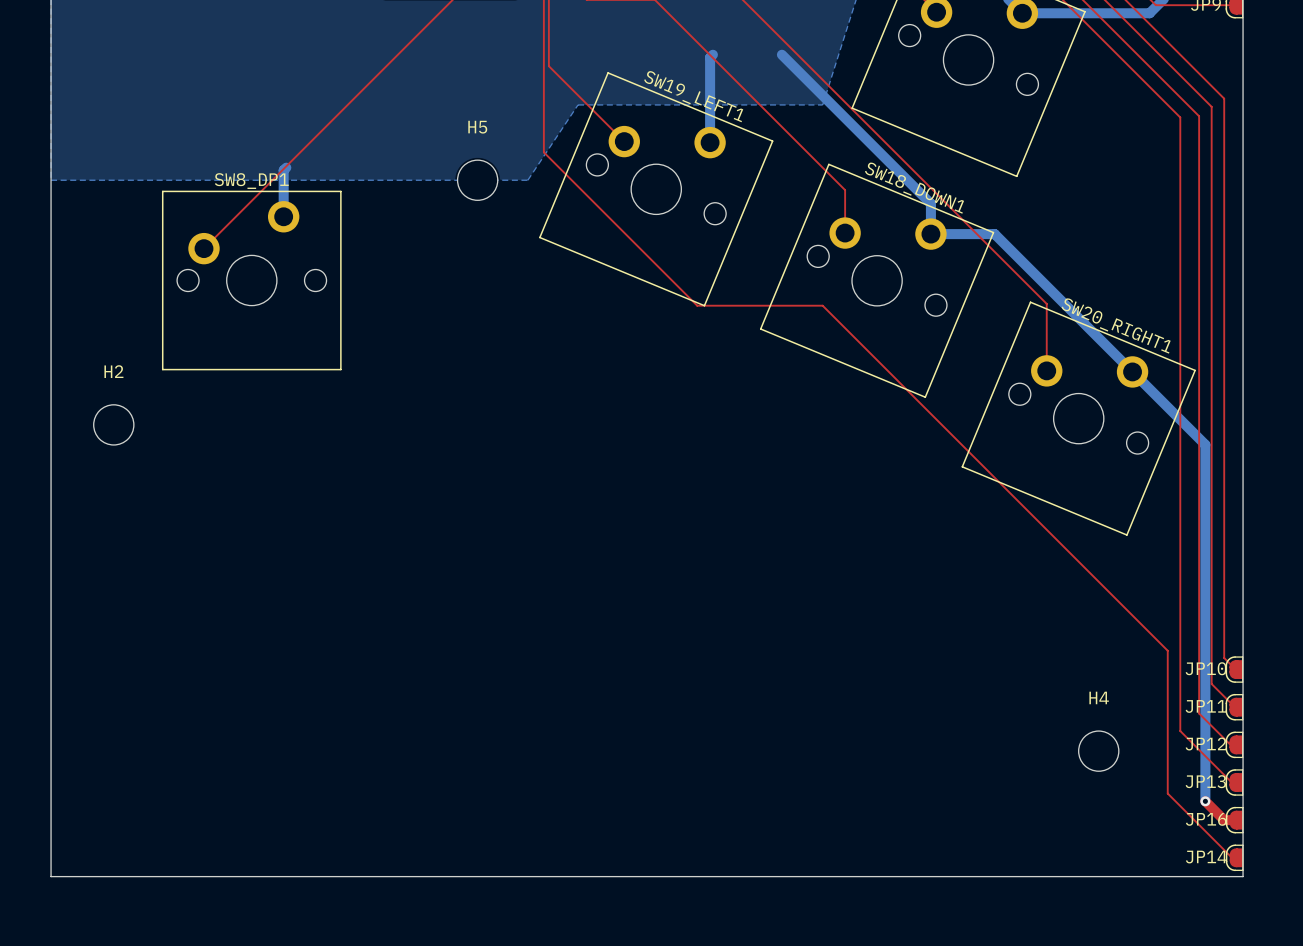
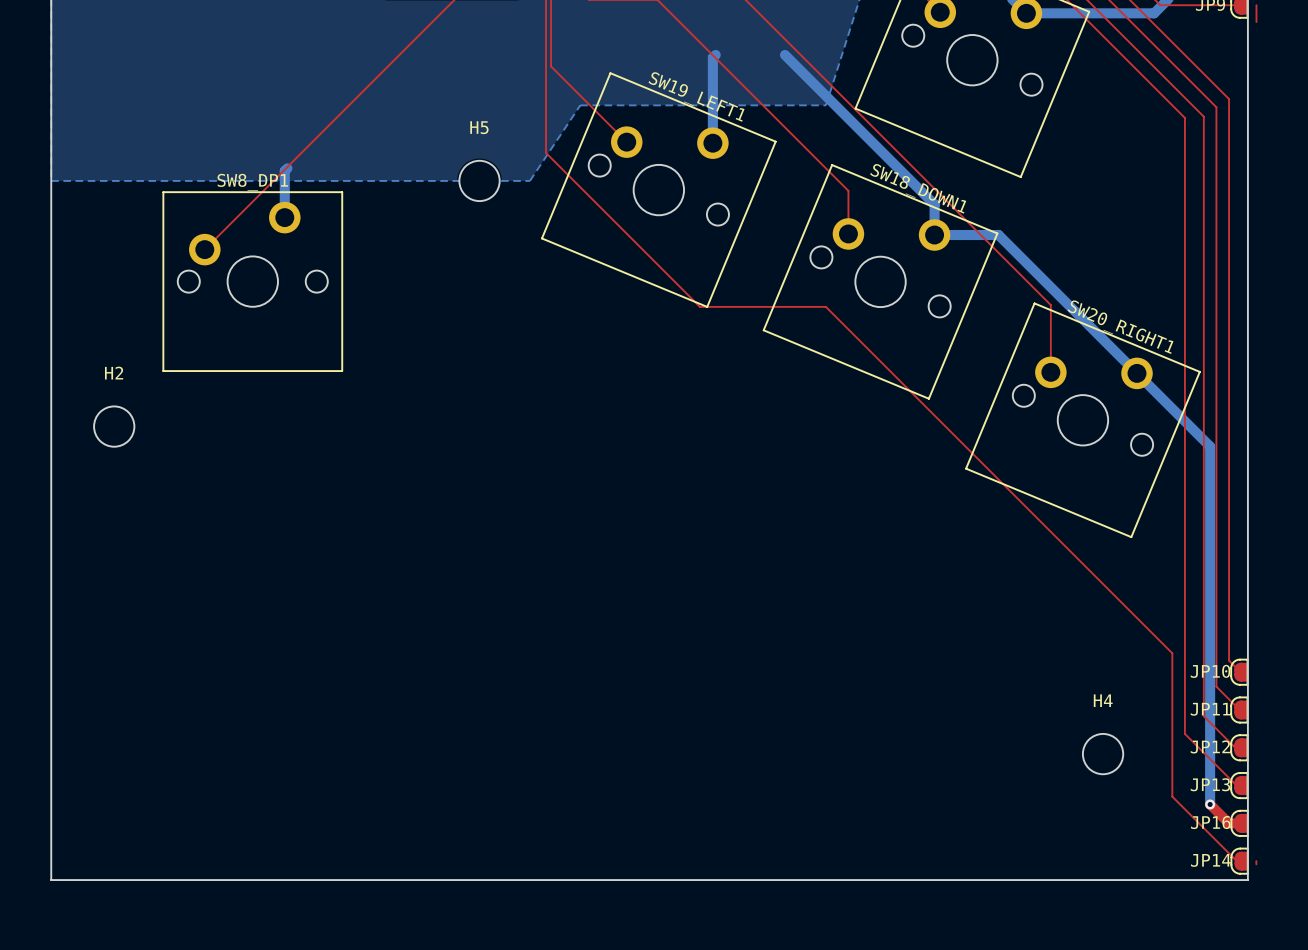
top track: none -> (1256, 5) (1256, 22)
top track: none -> (1256, 861) (1256, 864)

